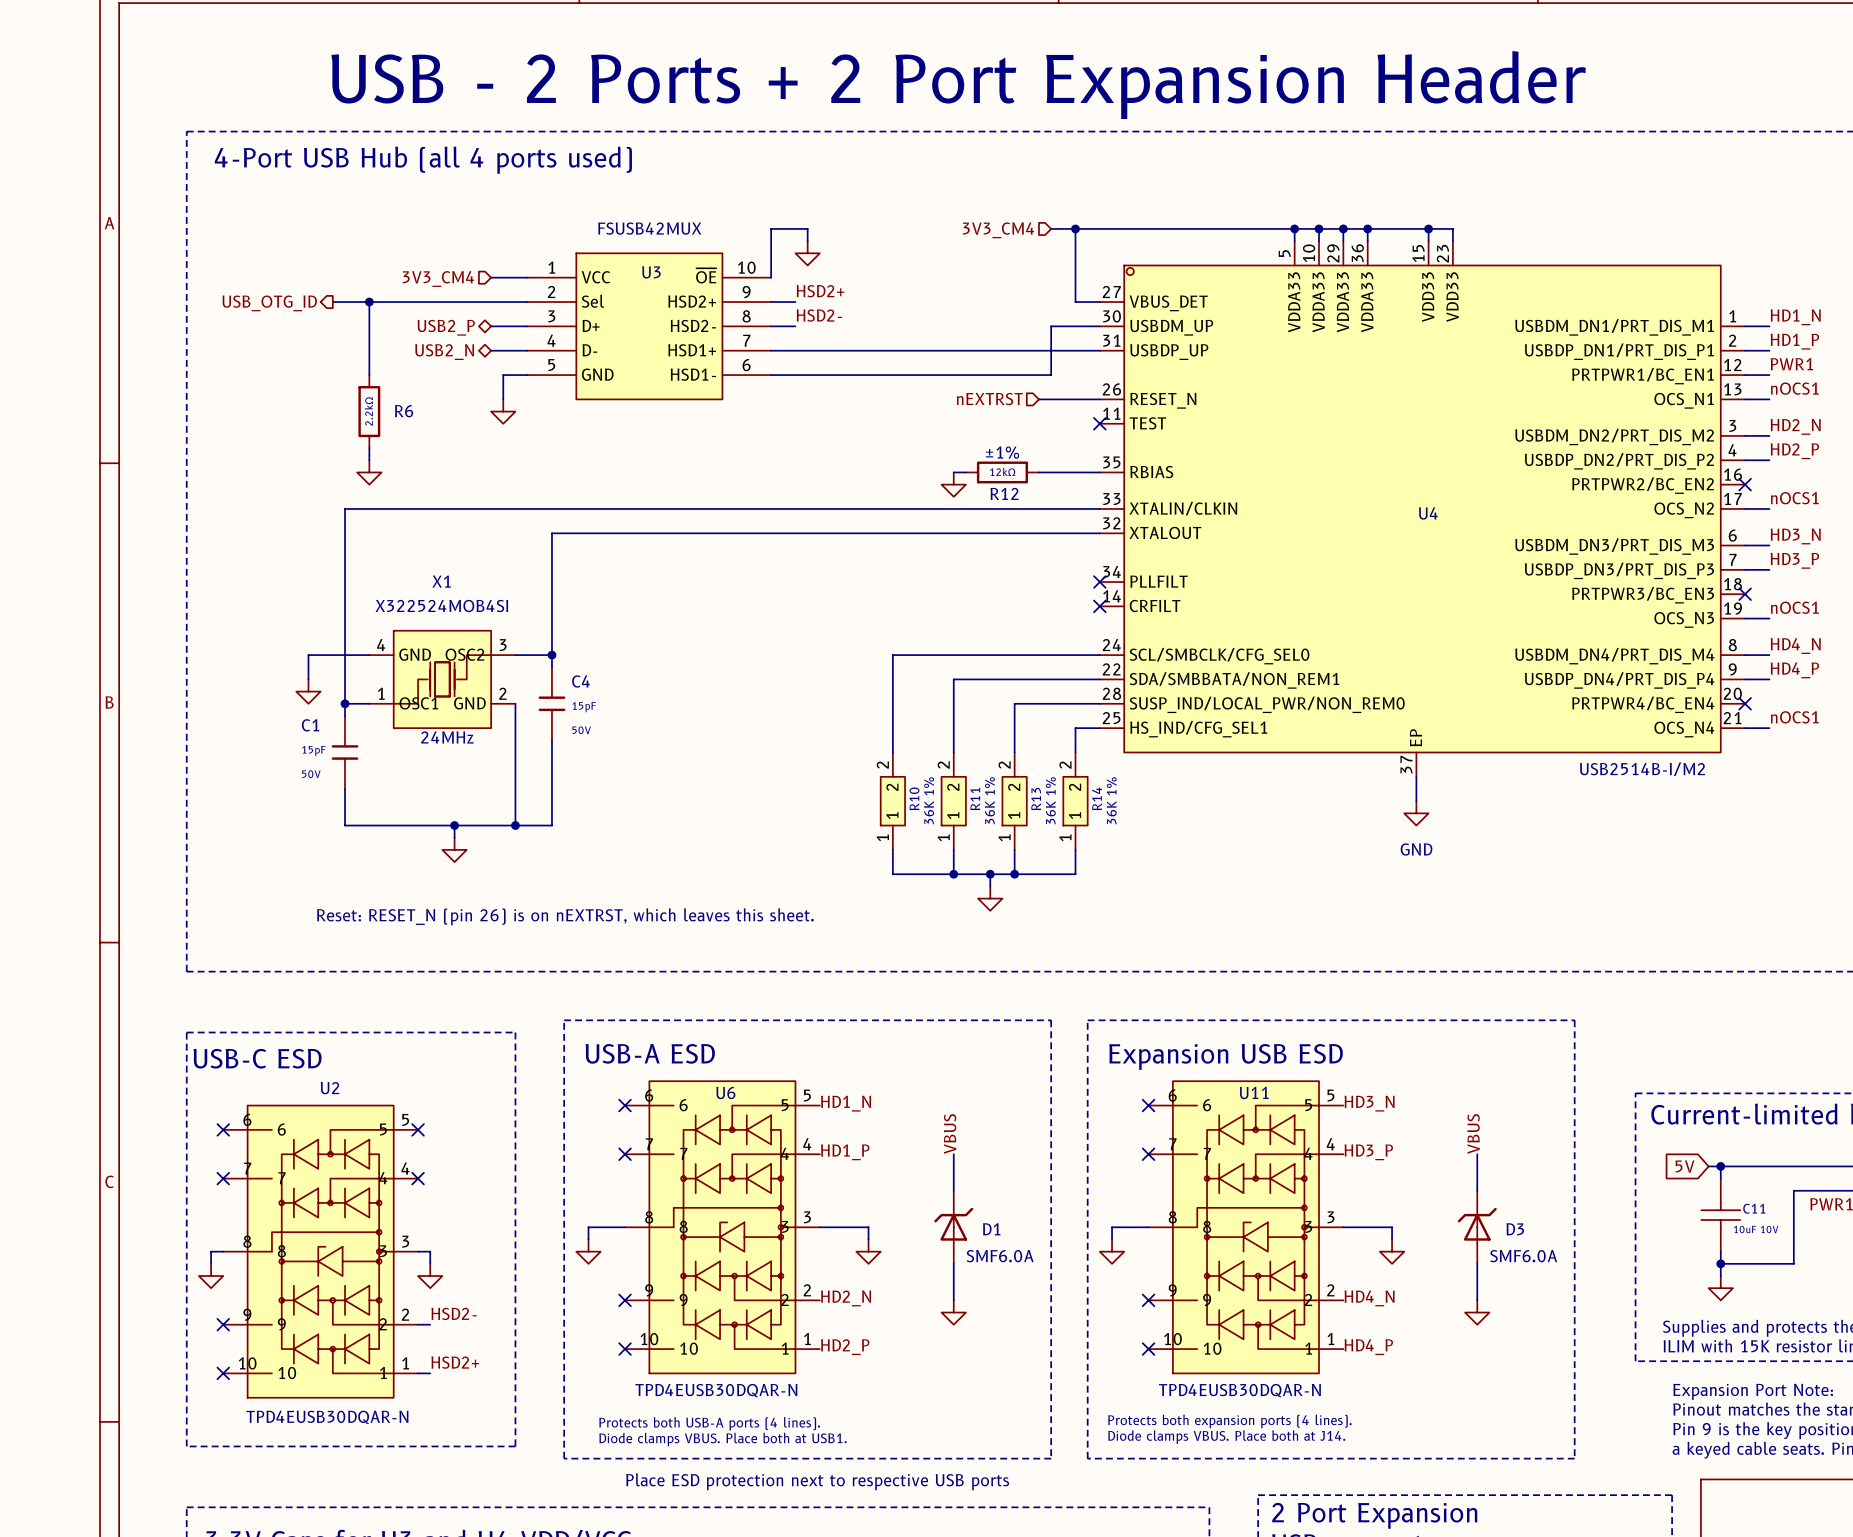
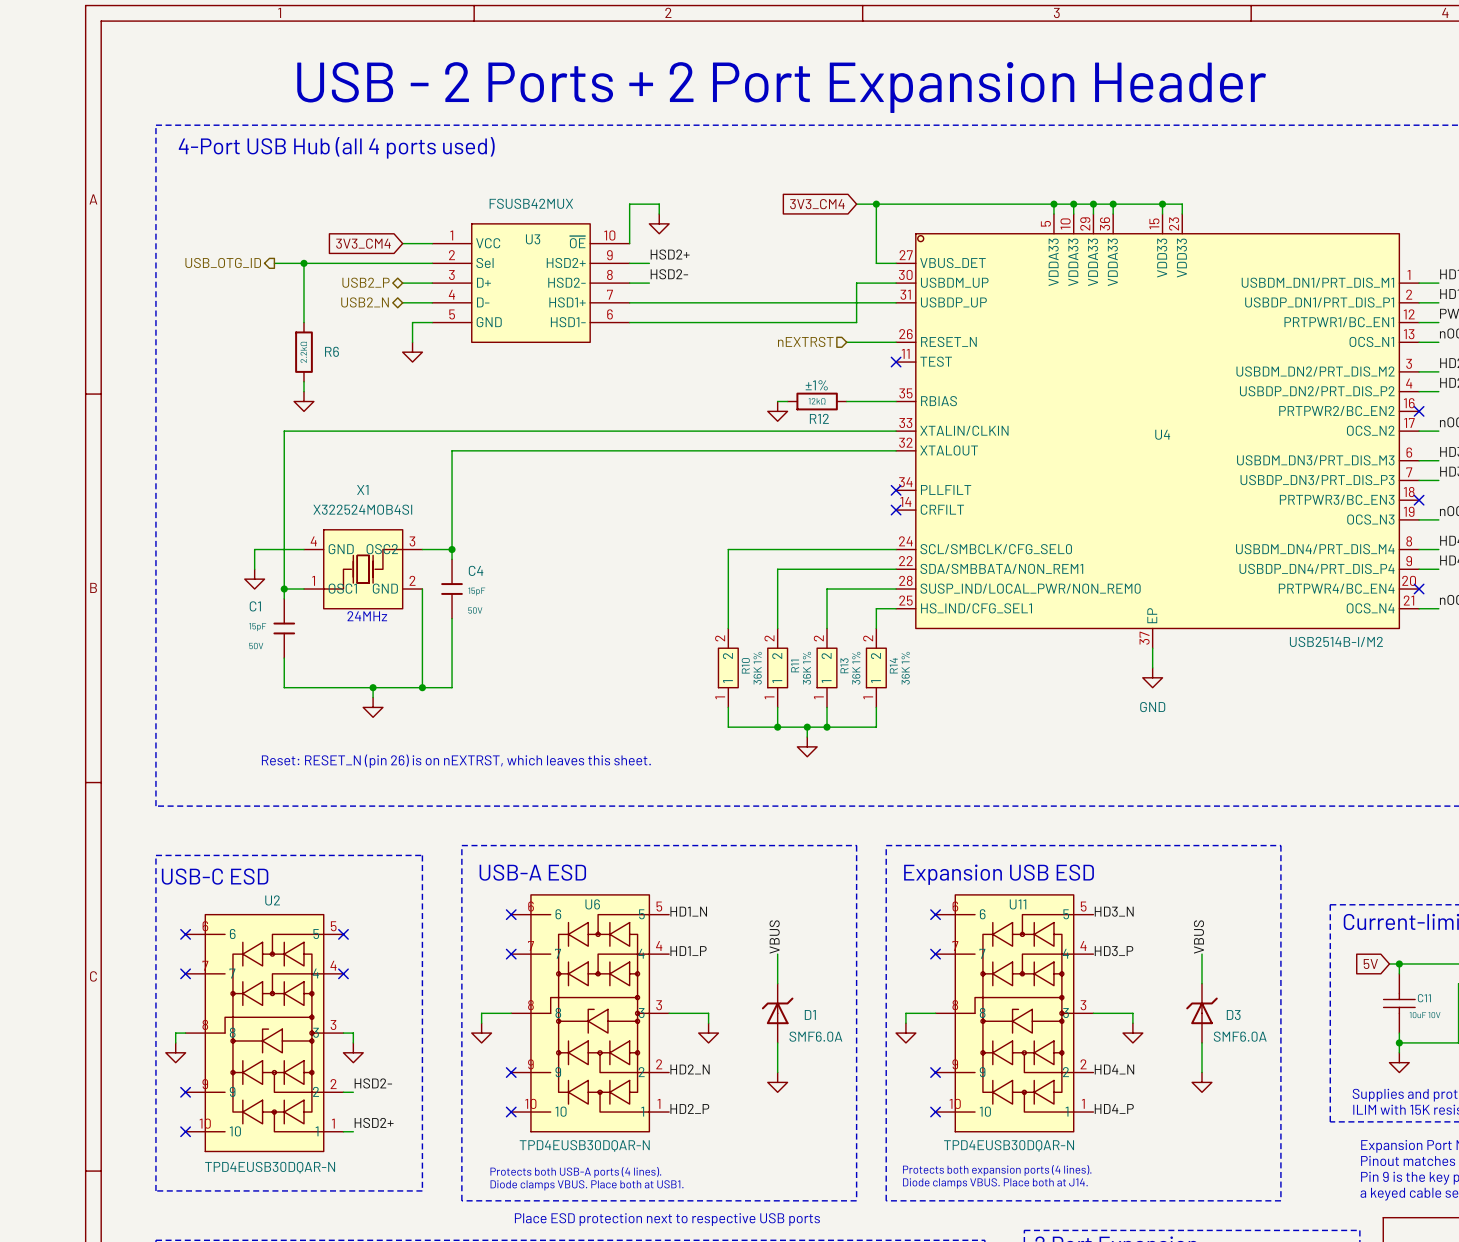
hierarchical label: 3V3_CM4 (998, 230) -> none
global label: none -> 3V3_CM4 (817, 204)
hierarchical label: 3V3_CM4 (438, 279) -> none
global label: none -> 3V3_CM4 (363, 243)

